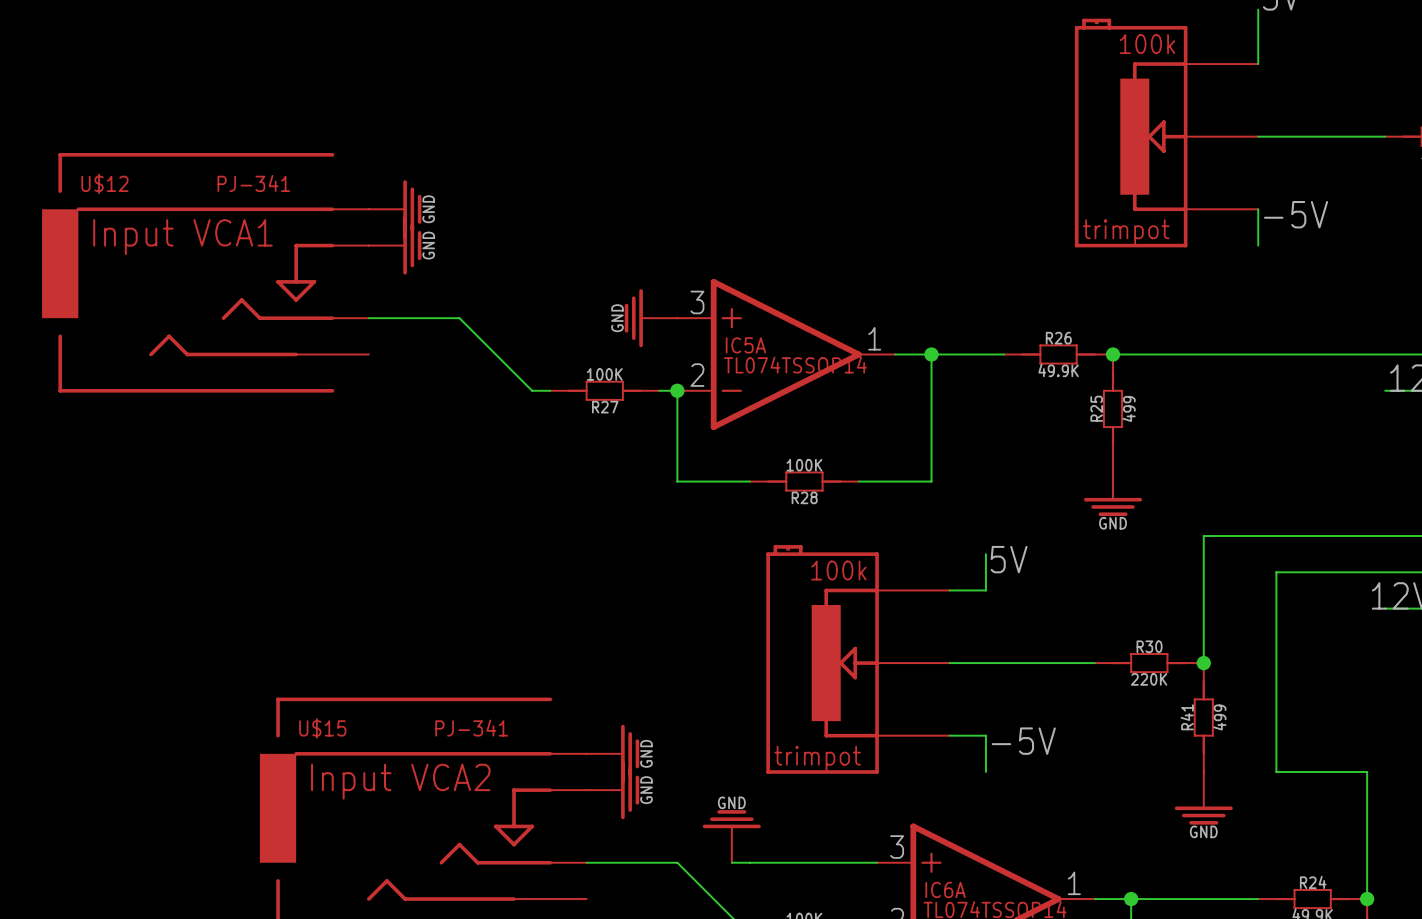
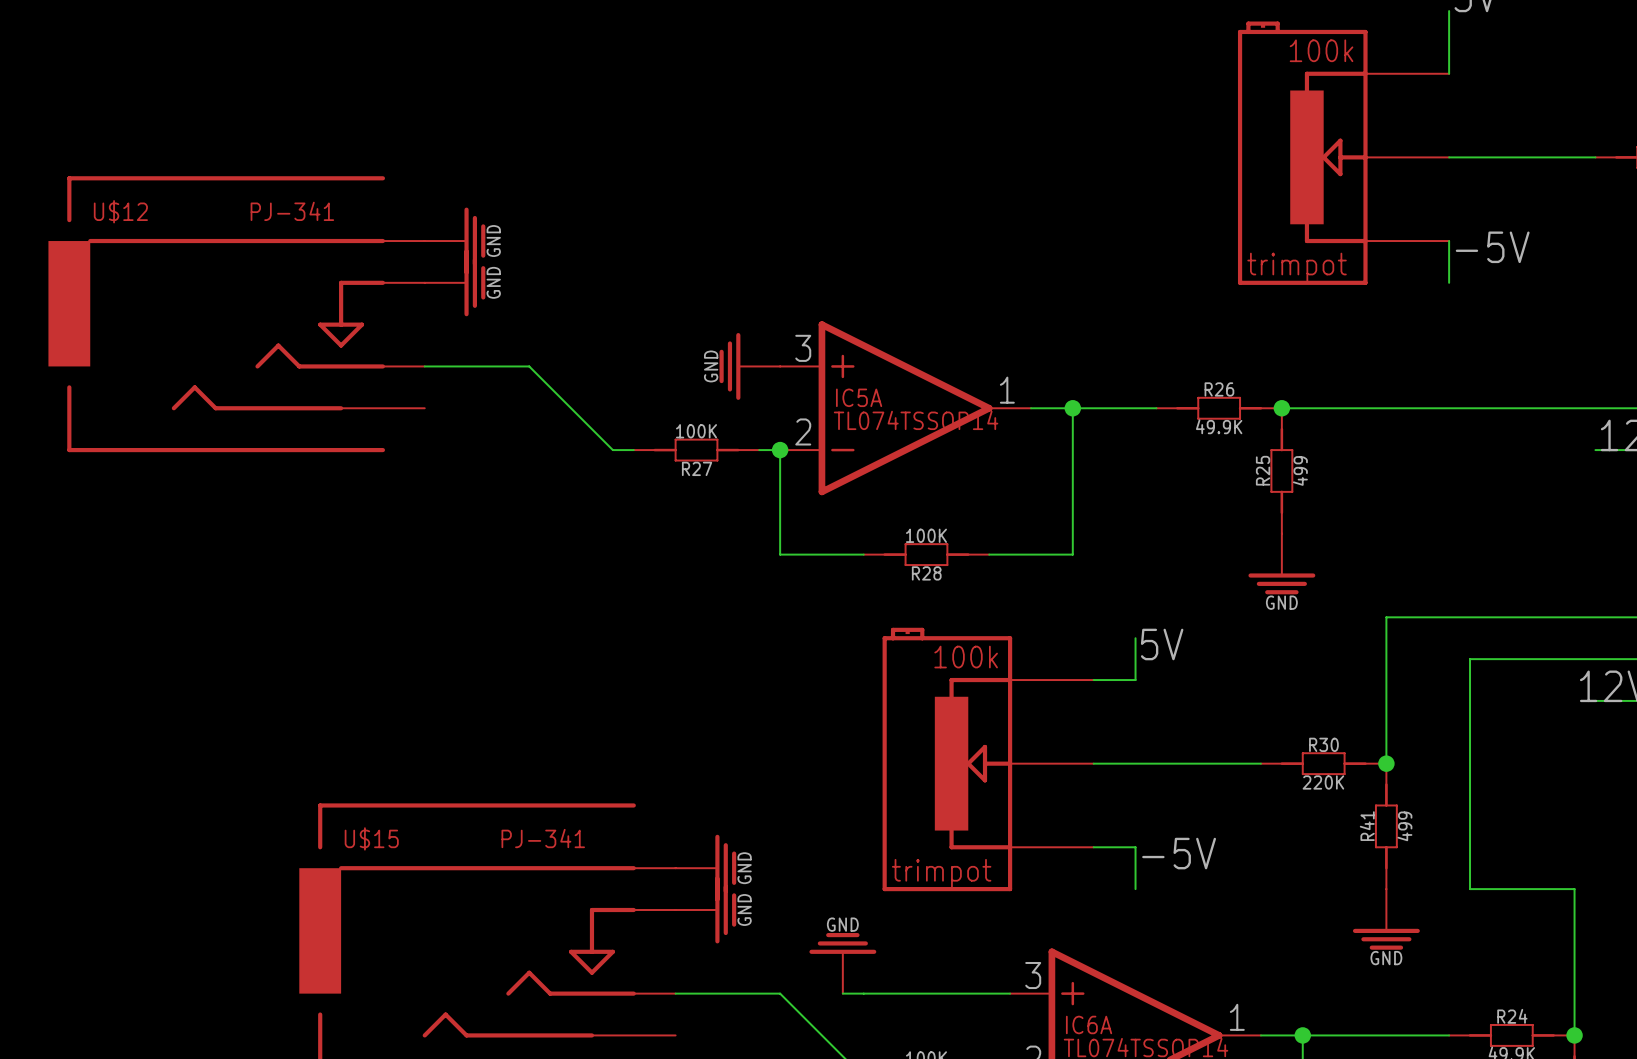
U$12 text: Input VCA1 (182, 237) -> none
U$15 text: Input VCA2 (400, 781) -> none

